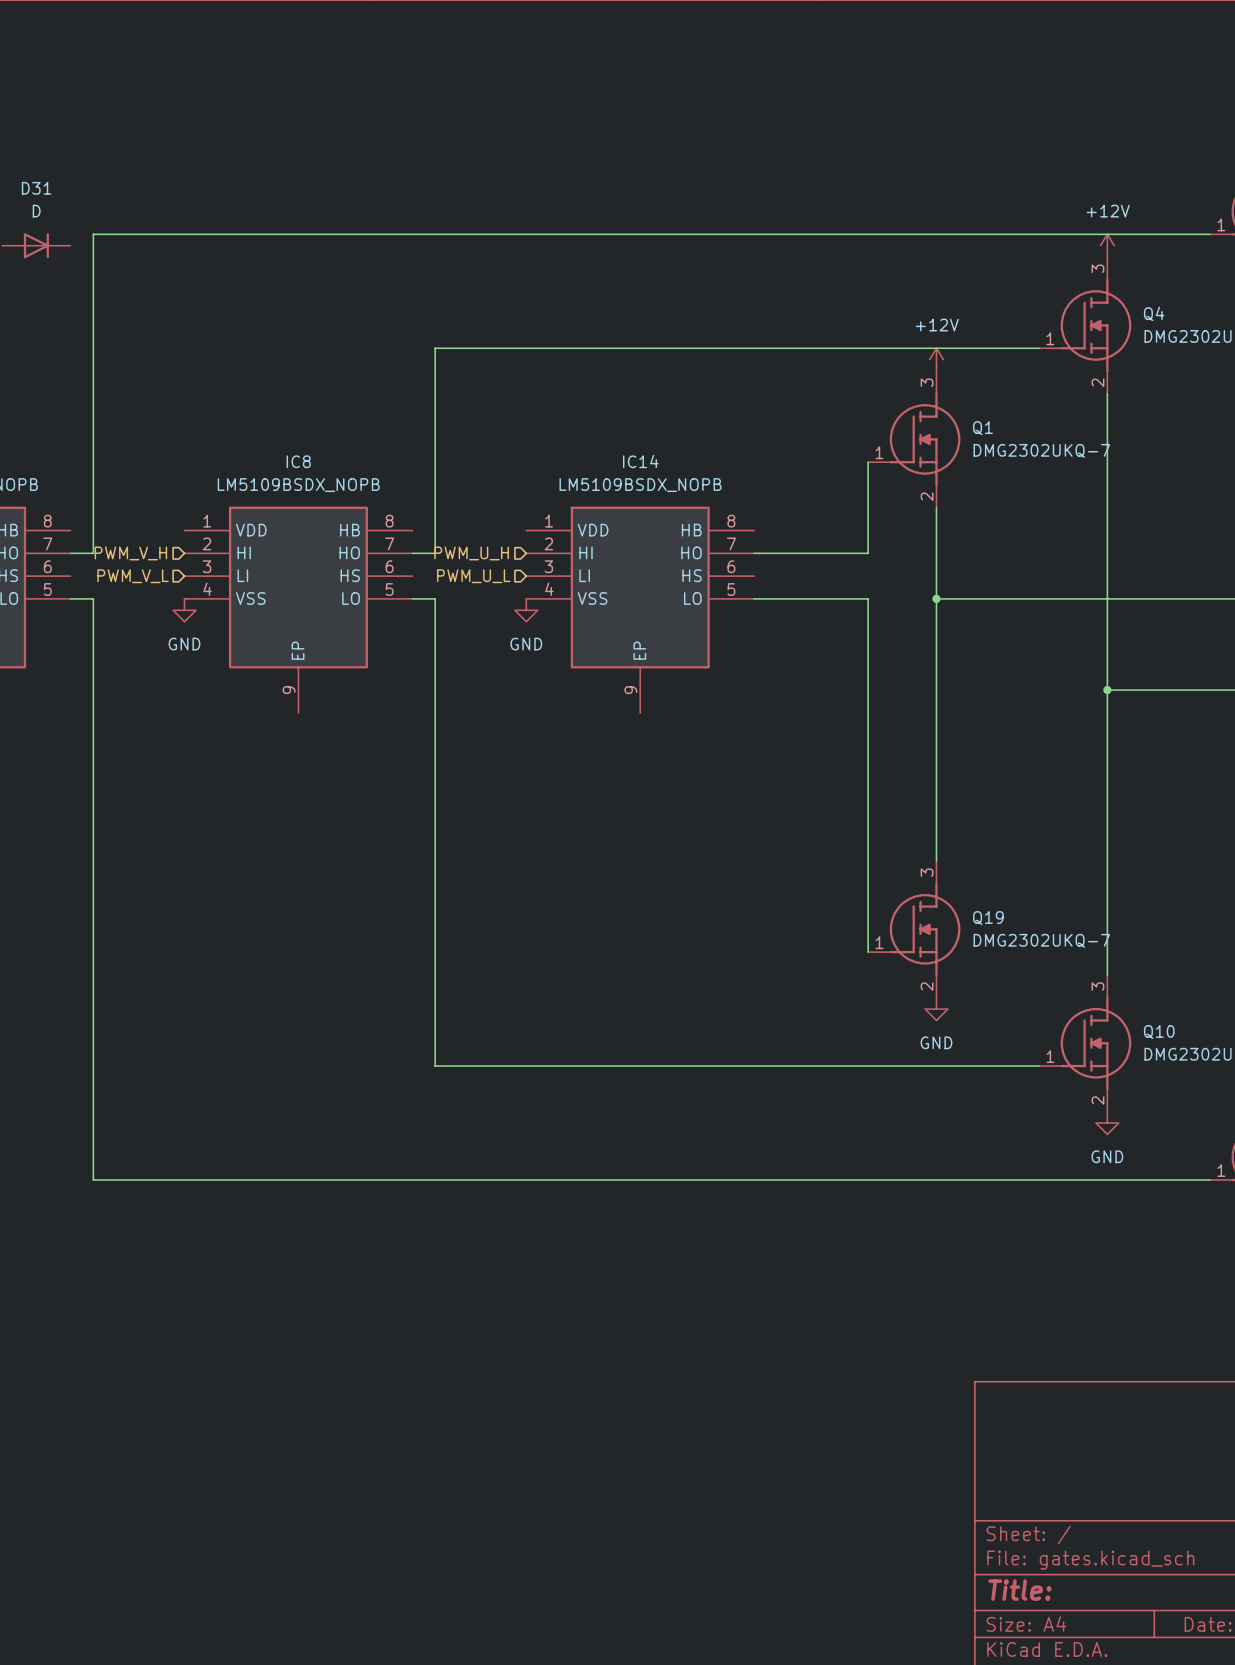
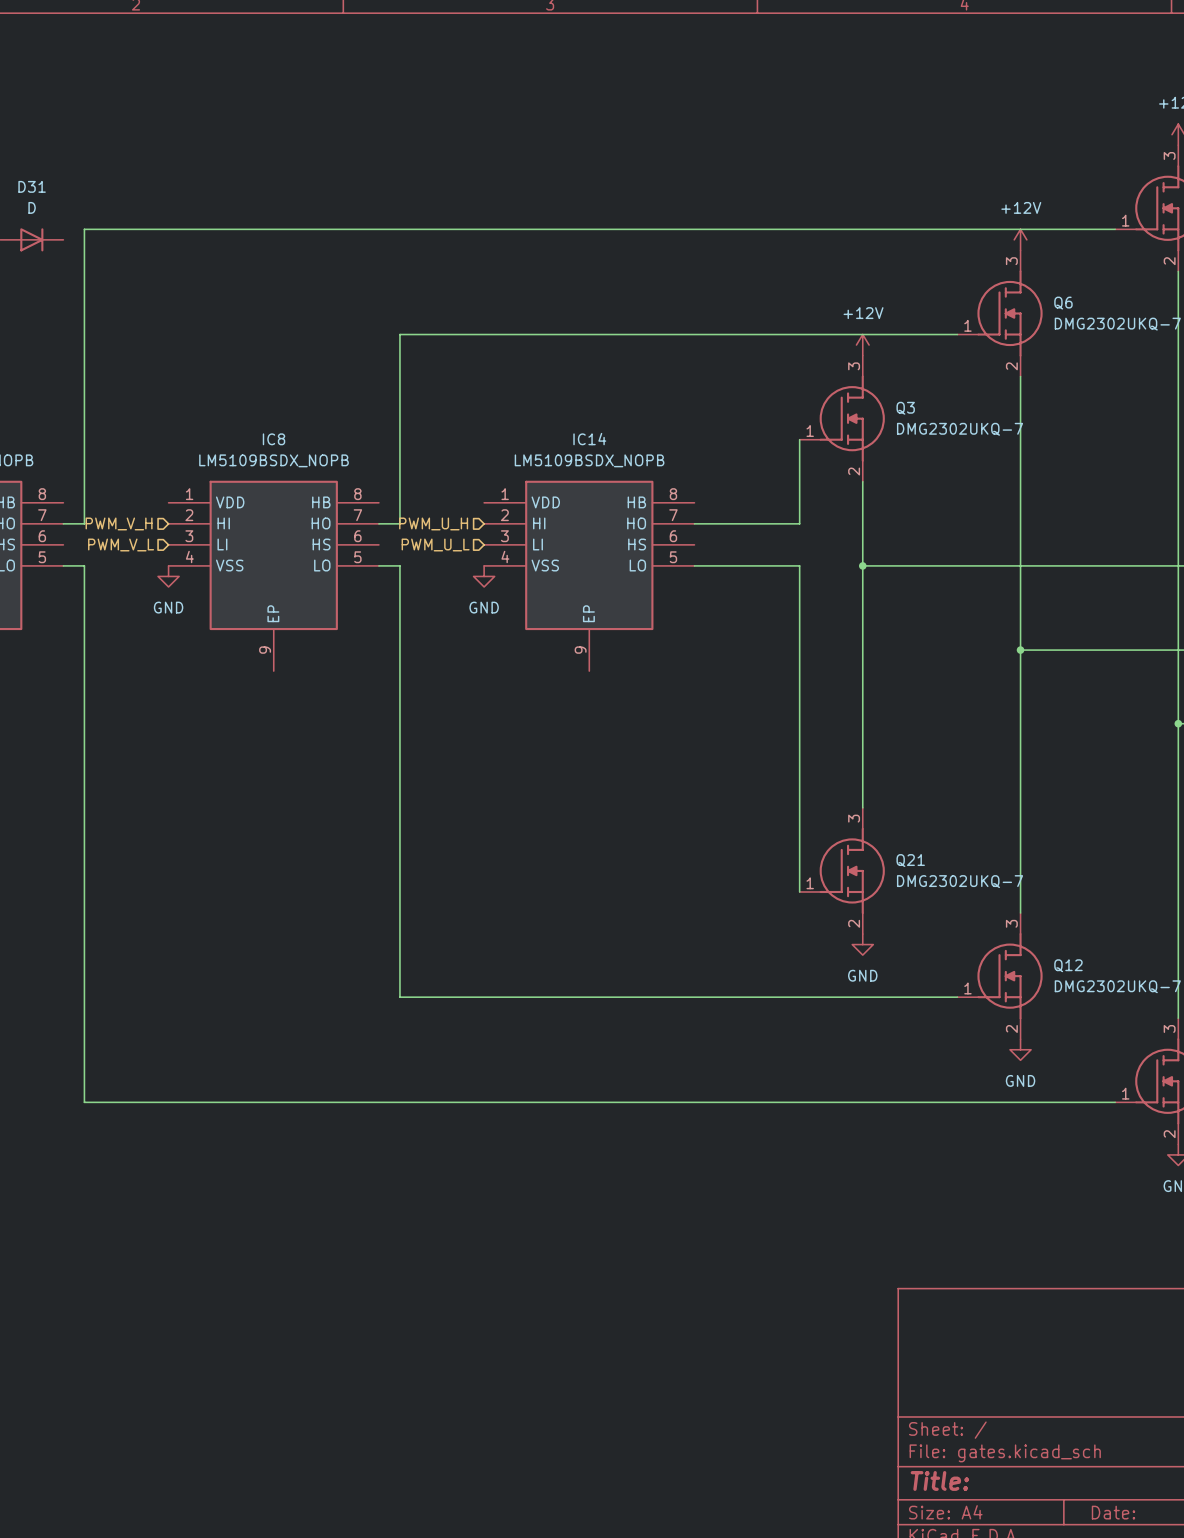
Q4 name: Q4 (1154, 313) -> Q6 (1063, 303)
Q1 name: Q1 (982, 428) -> Q3 (905, 408)
Q19 name: Q19 (988, 918) -> Q21 (910, 860)
Q10 name: Q10 (1159, 1031) -> Q12 (1068, 965)

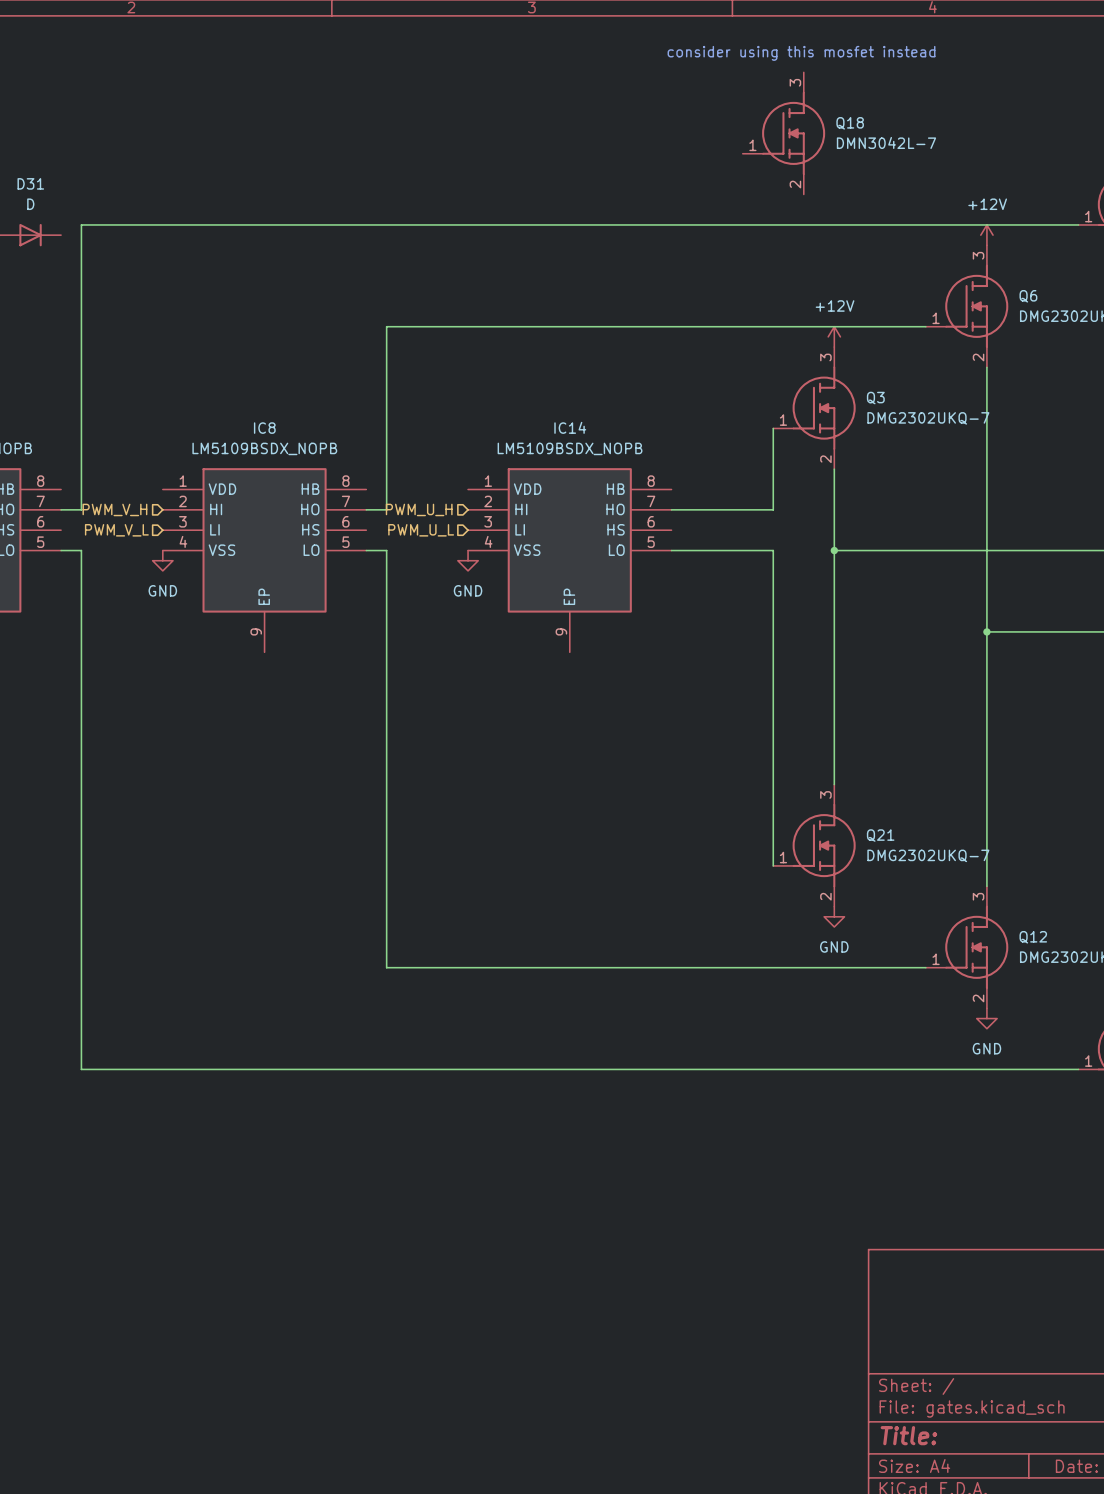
text: none -> consider using this mosfet instead (801, 53)
Q18: none -> DMN3042L-7 (783, 133)

